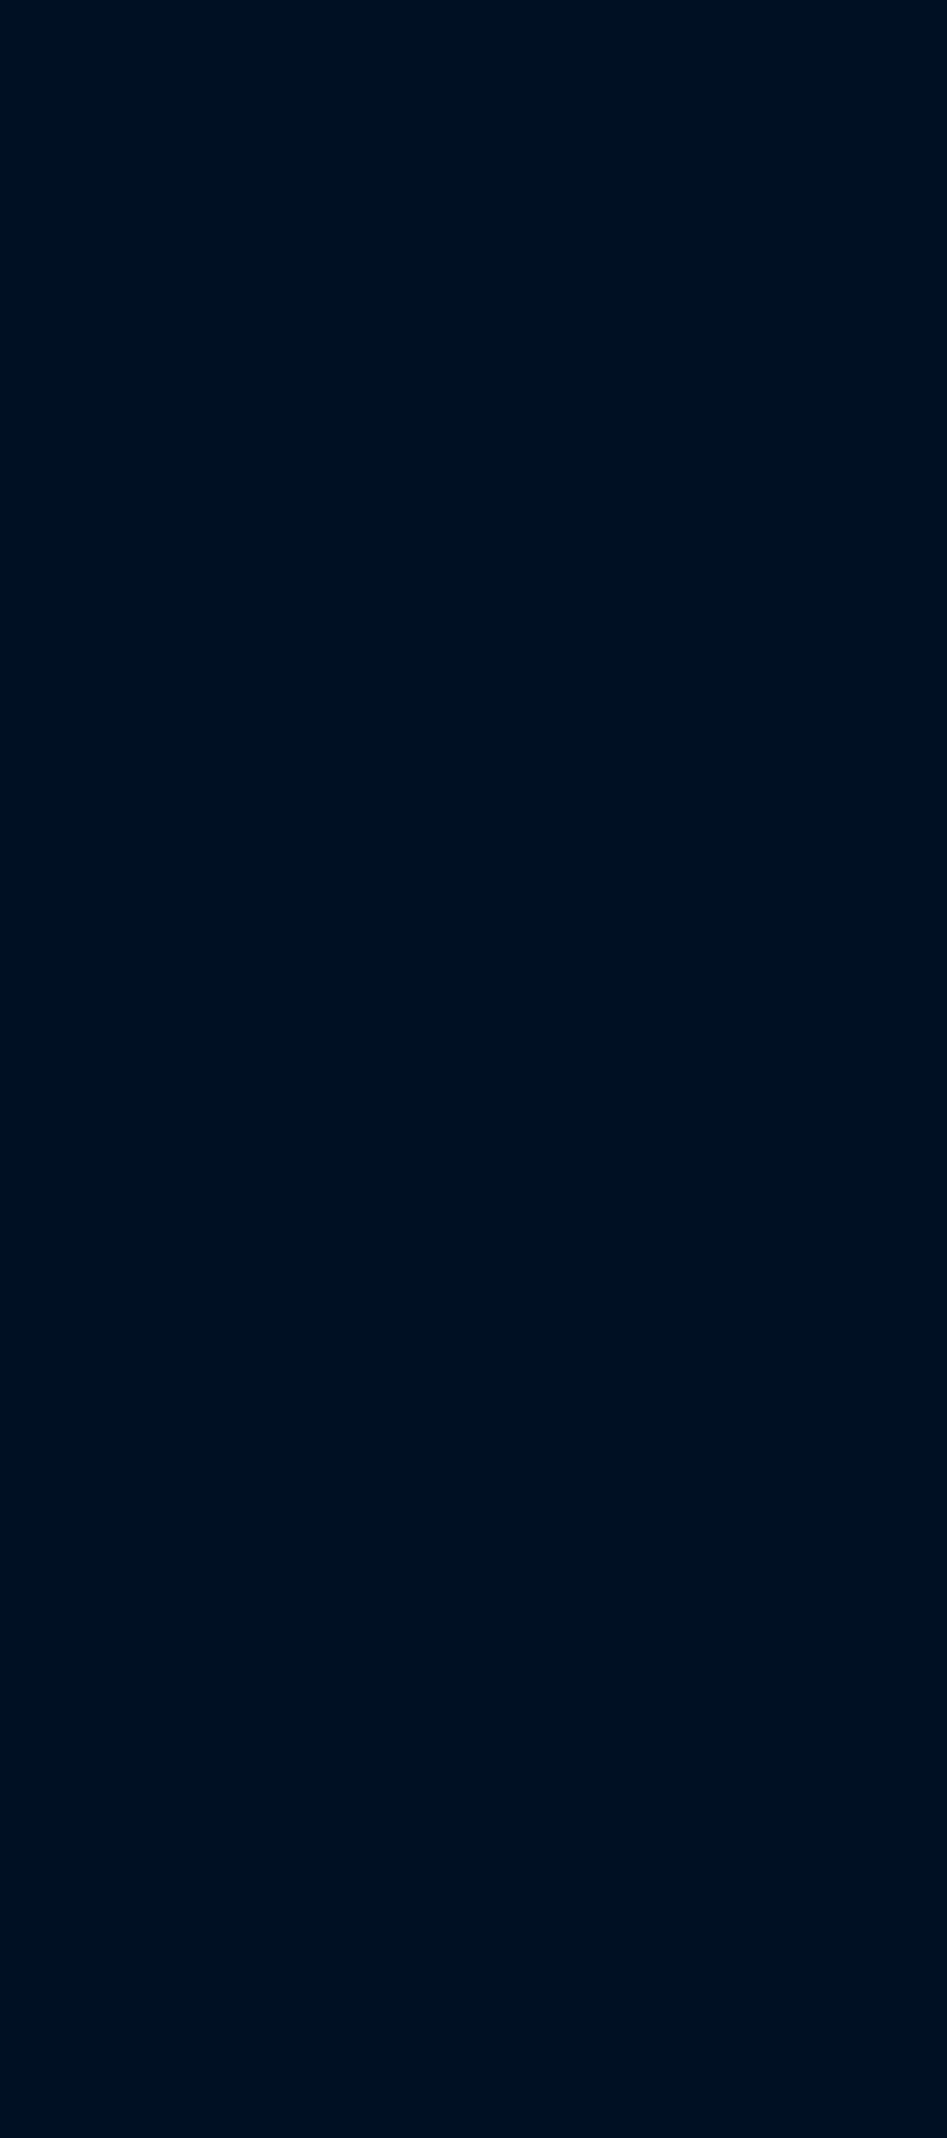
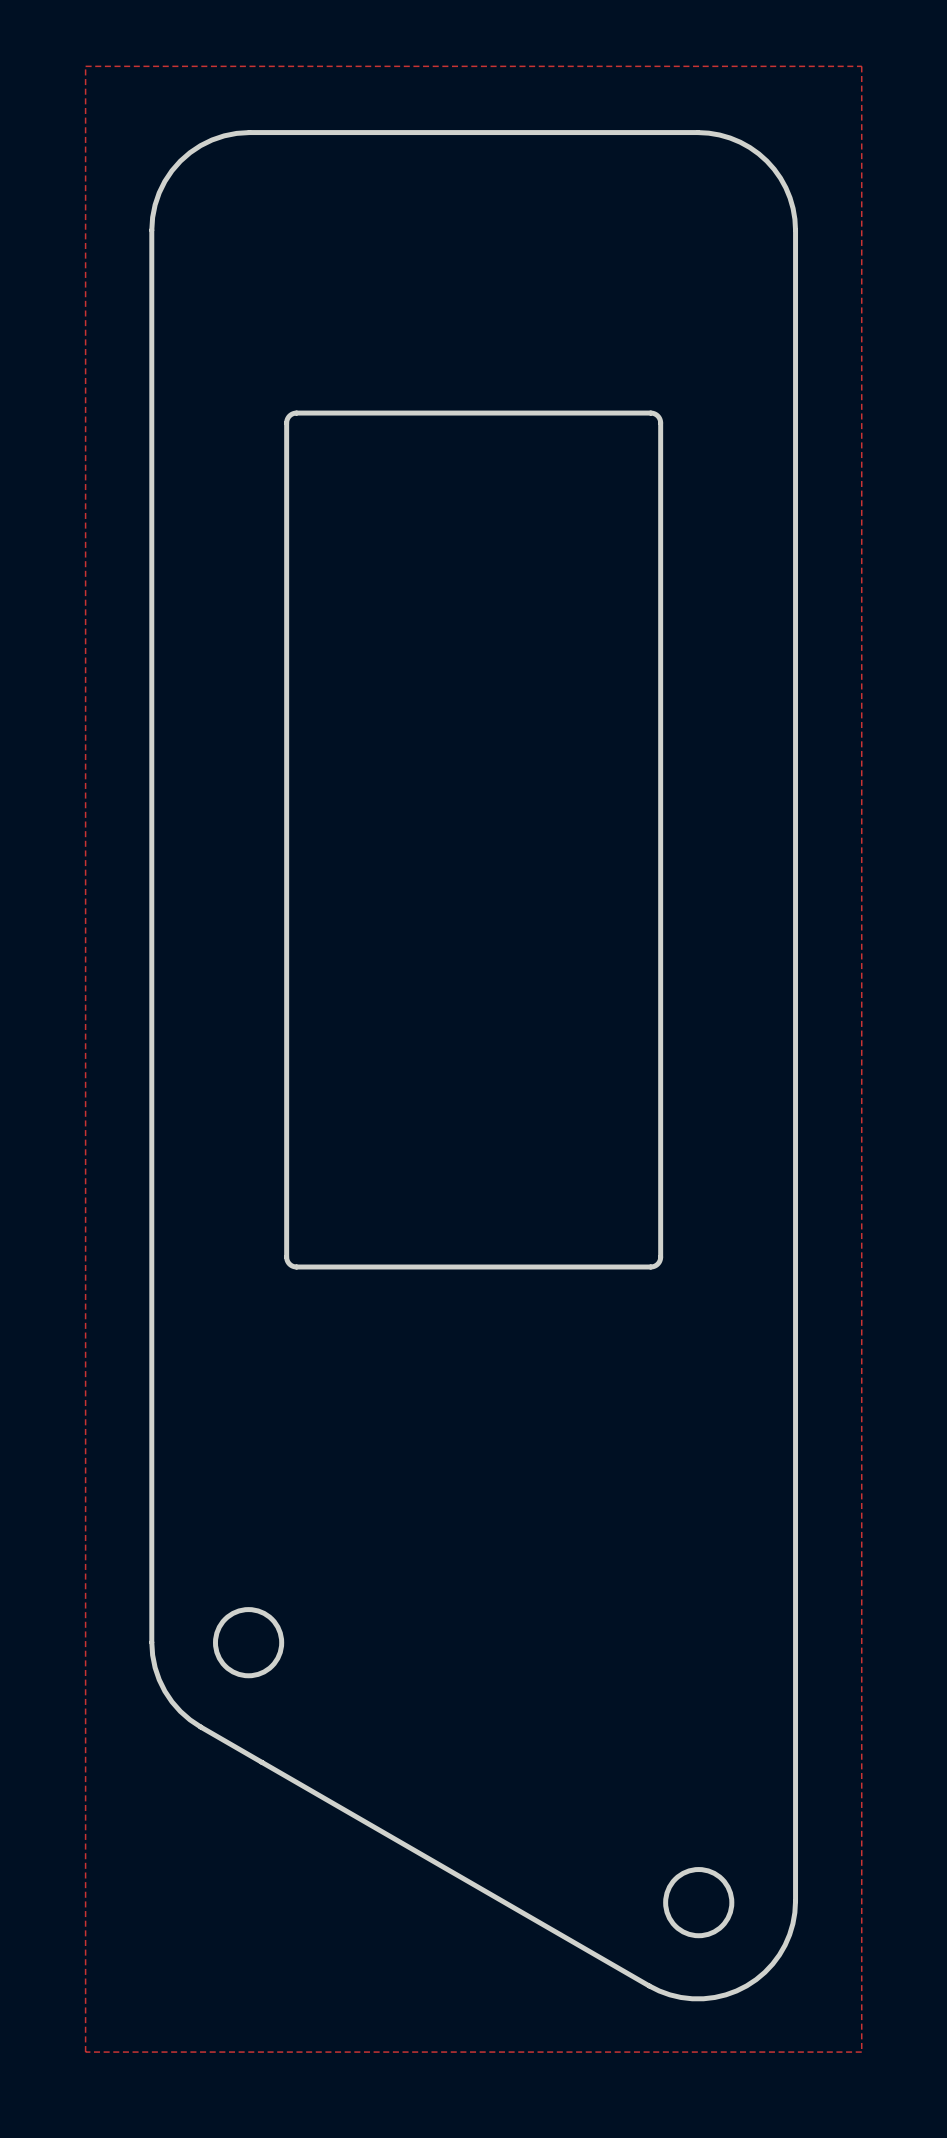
zone outline: none -> (85, 66) (861, 66) (861, 2052) (85, 2052) (85, 66)
board edge: none -> (249, 132) (708, 133) (740, 142) (766, 161) (780, 178) (793, 208) (795, 230) (795, 1901) (792, 1923) (779, 1954) (756, 1979) (725, 1994) (703, 1998) (680, 1997) (649, 1985) (200, 1726) (189, 1719) (171, 1701) (159, 1679) (155, 1667) (151, 1642) (151, 230) (155, 204) (159, 192) (164, 181) (180, 161) (200, 145) (212, 139) (236, 133) (249, 132)
board edge: none -> (296, 413) (650, 413) (656, 414) (659, 418) (660, 1257) (659, 1262) (655, 1266) (296, 1267) (291, 1265) (287, 1260) (286, 422) (289, 415) (296, 413)
round board edge: none -> [213, 1607, 285, 1679]
round board edge: none -> [663, 1867, 735, 1939]

